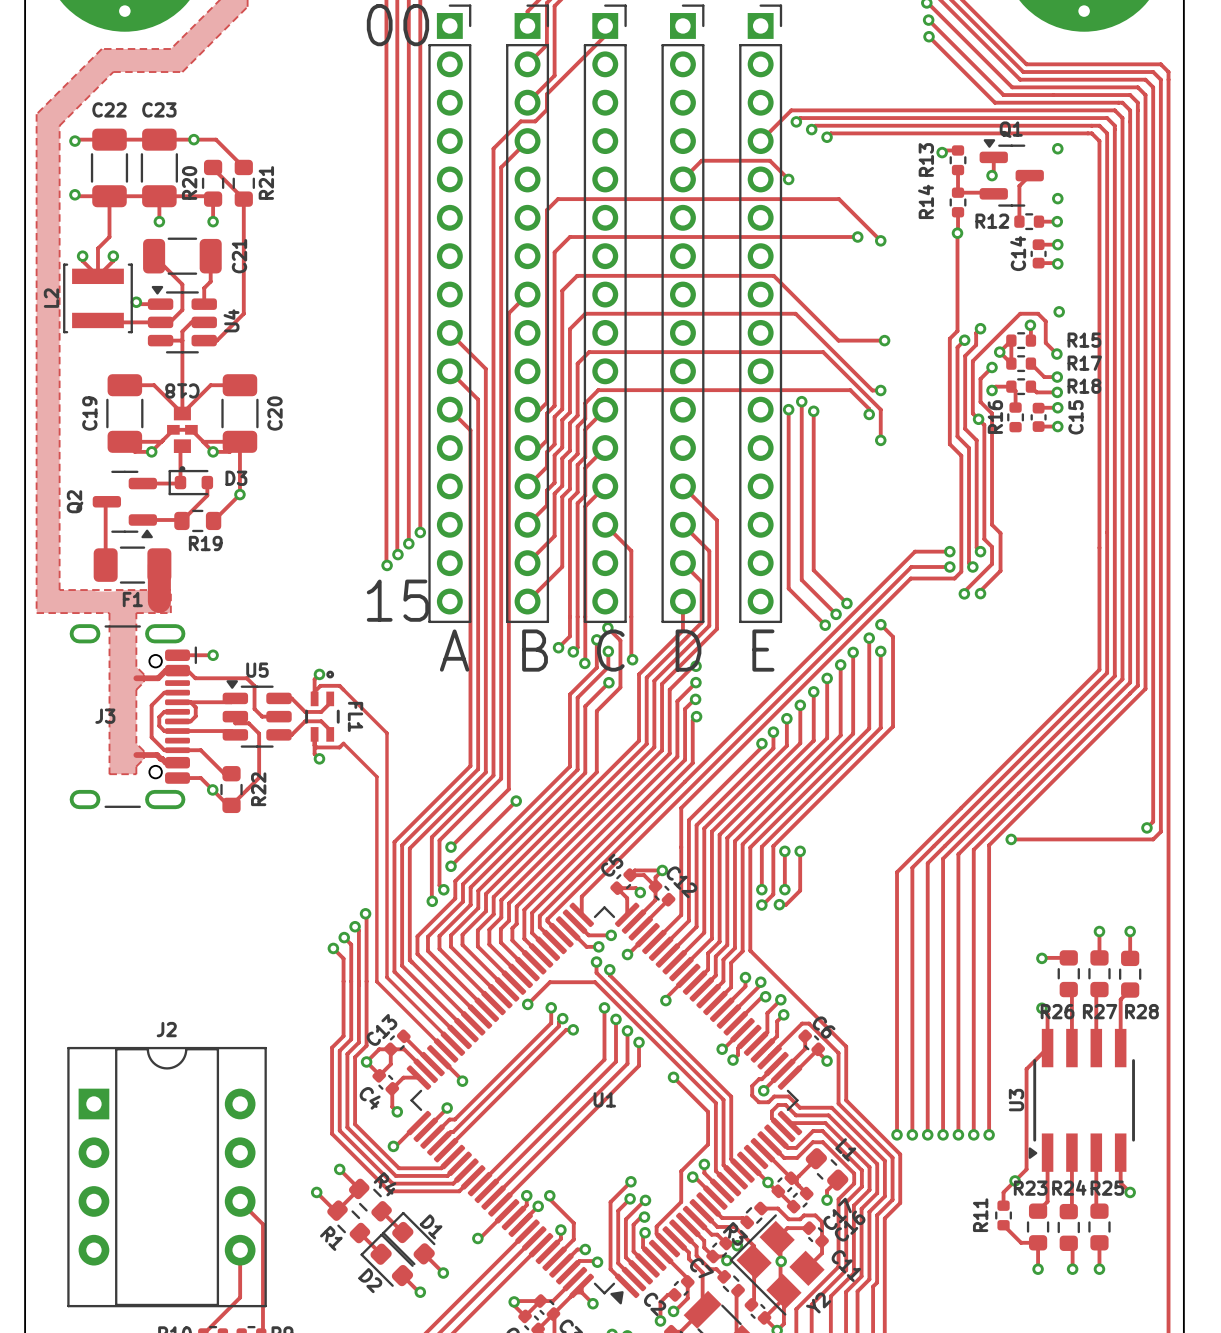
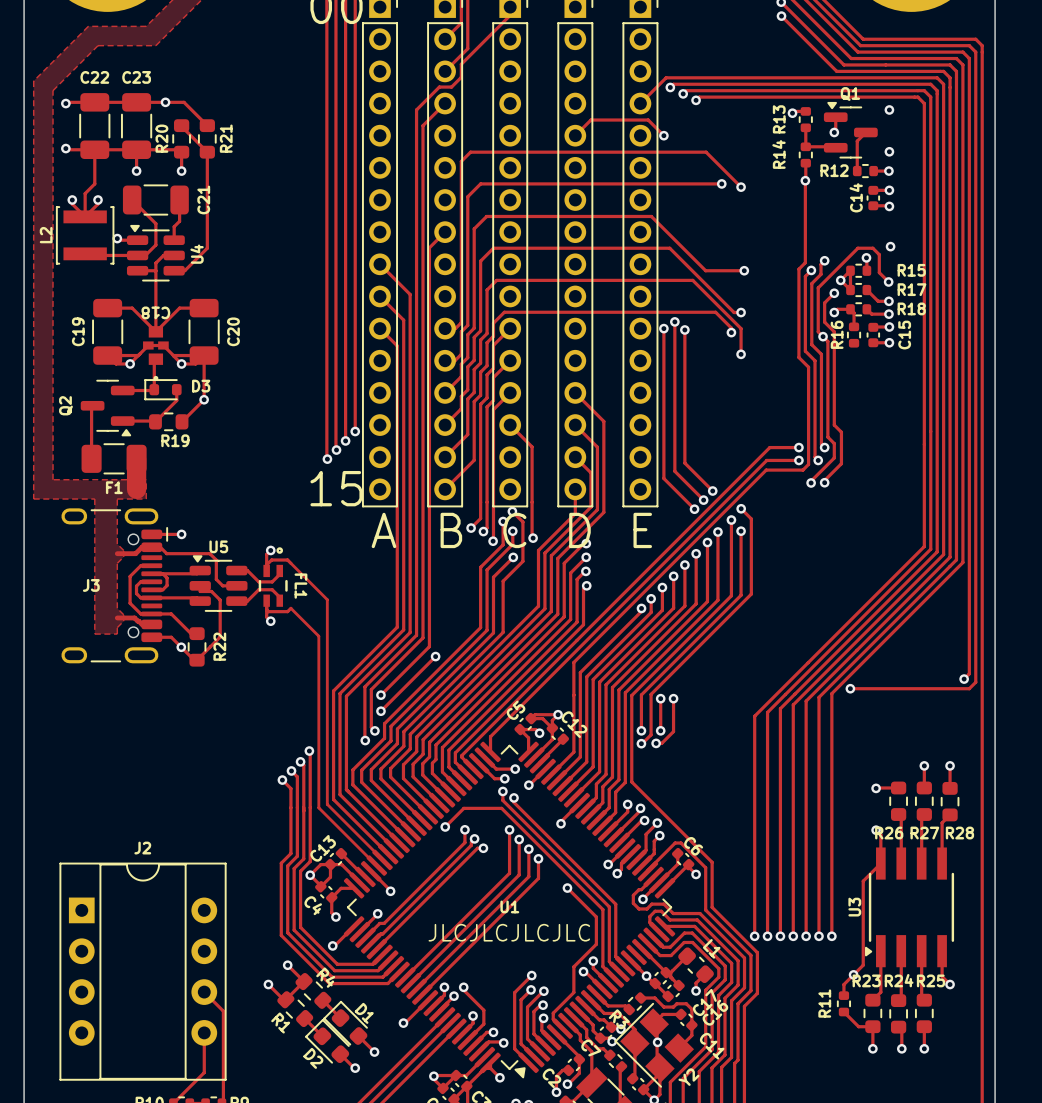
text: none -> JLCJLCJLCJLC (509, 932)

